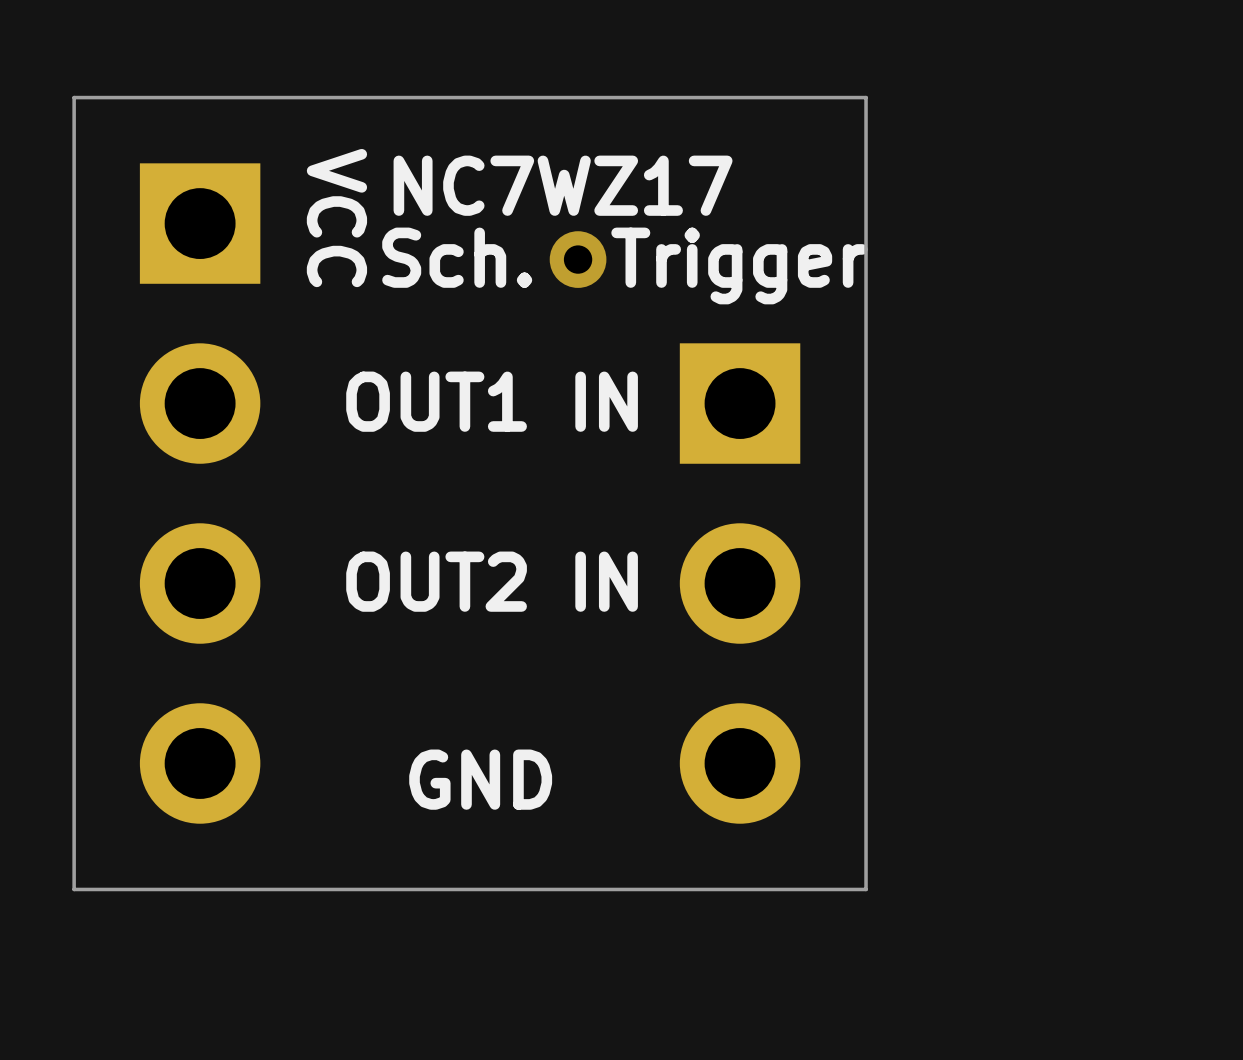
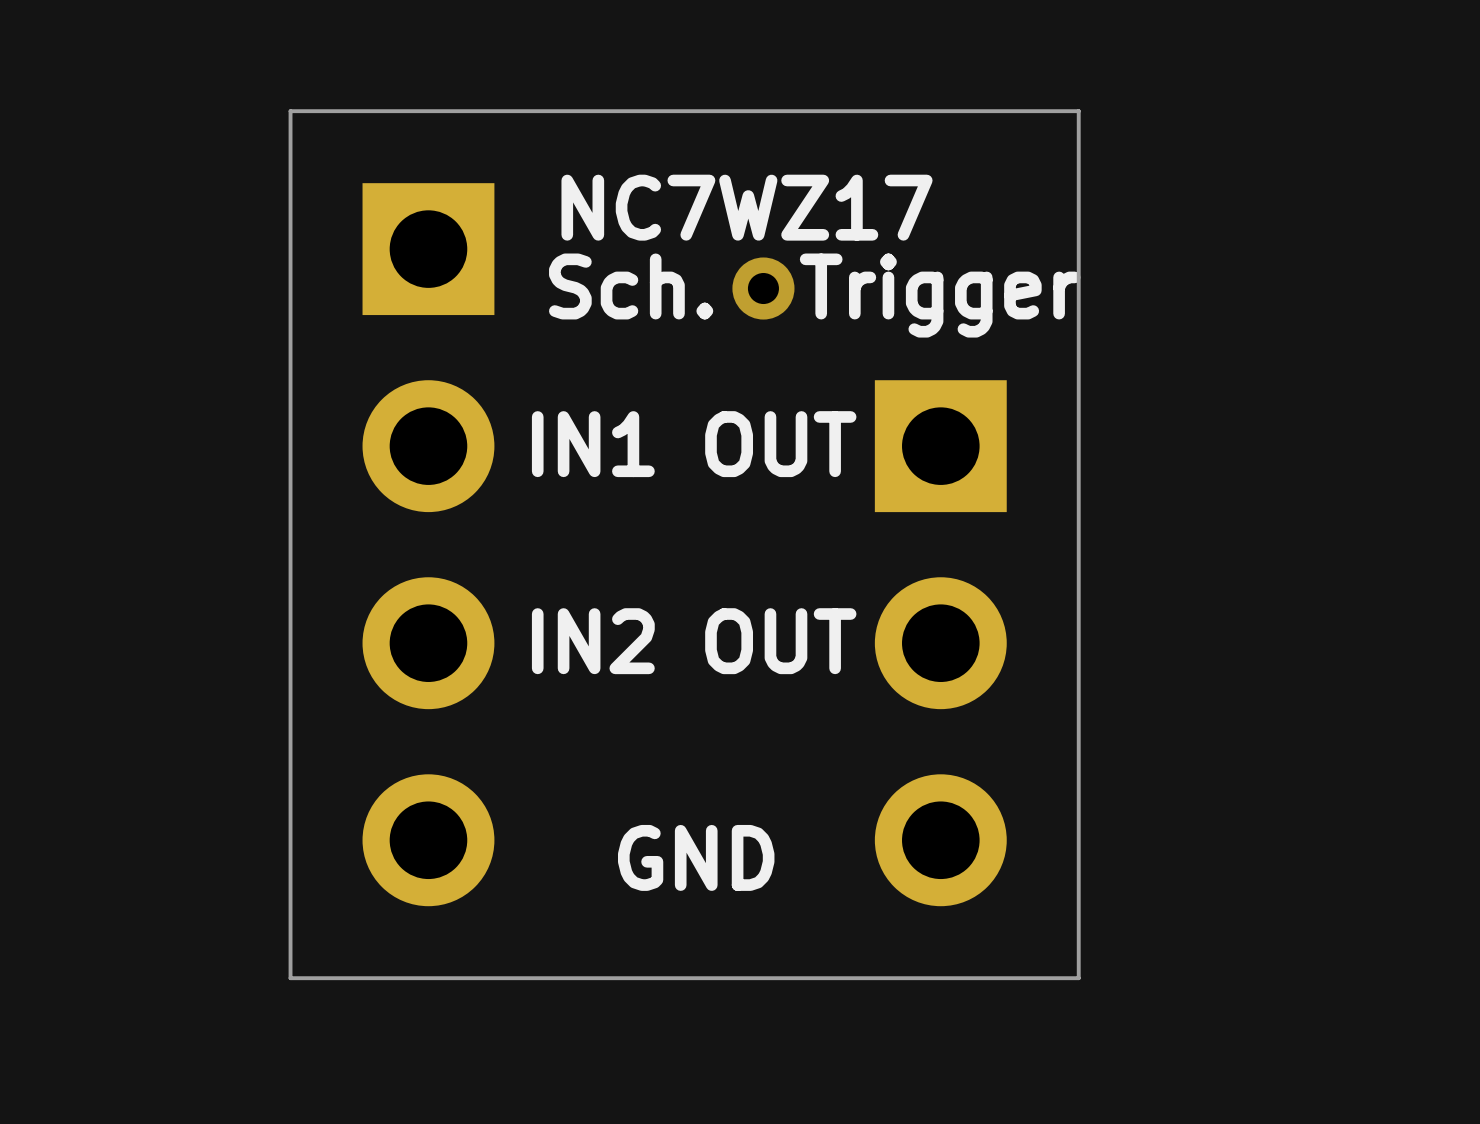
board edge: (146, 97) (74, 97) (74, 889) (146, 889) -> (290, 111) (290, 978)
text: VCC (336, 218) -> none
text: OUT1 IN (492, 401) -> IN1 OUT (694, 444)
part position: (200, 493) -> (428, 544)
text: OUT2 IN (492, 581) -> IN2 OUT (694, 641)
text position: GND (480, 779) -> GND (696, 857)

